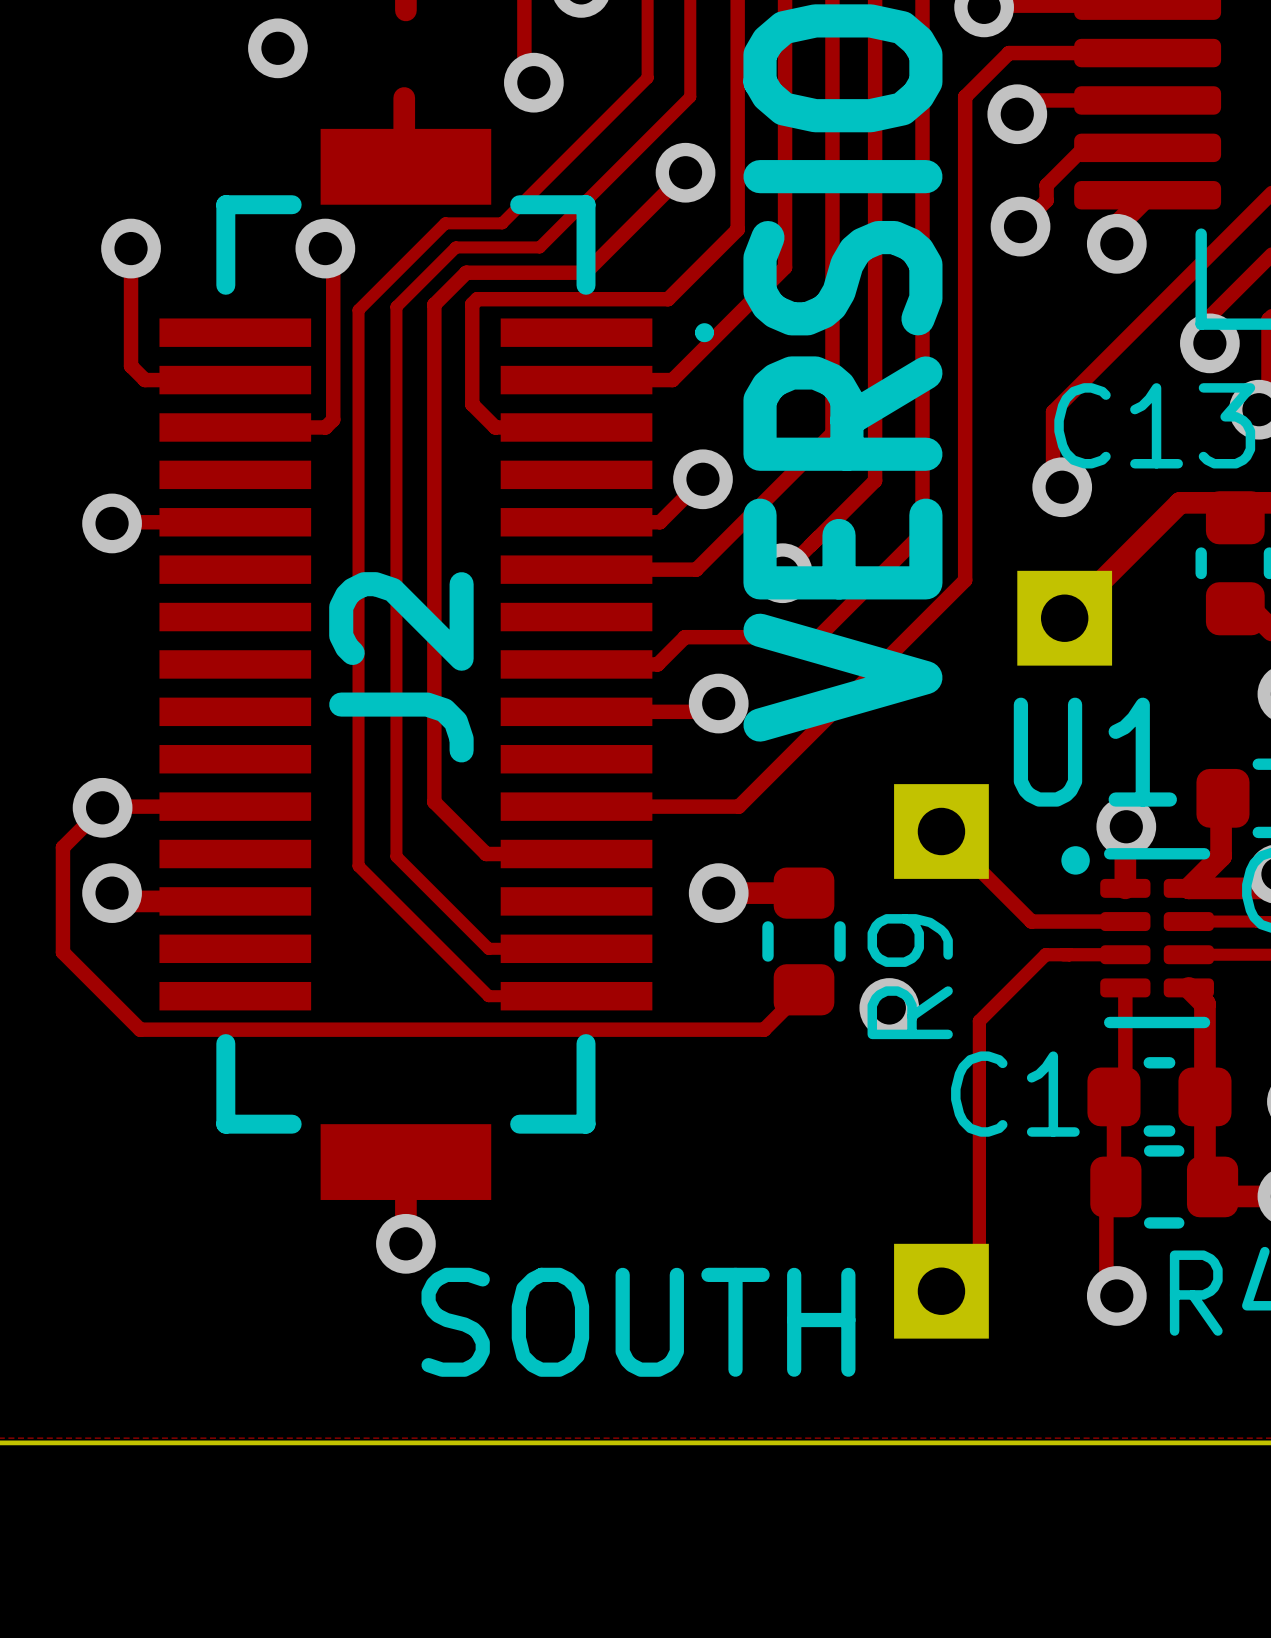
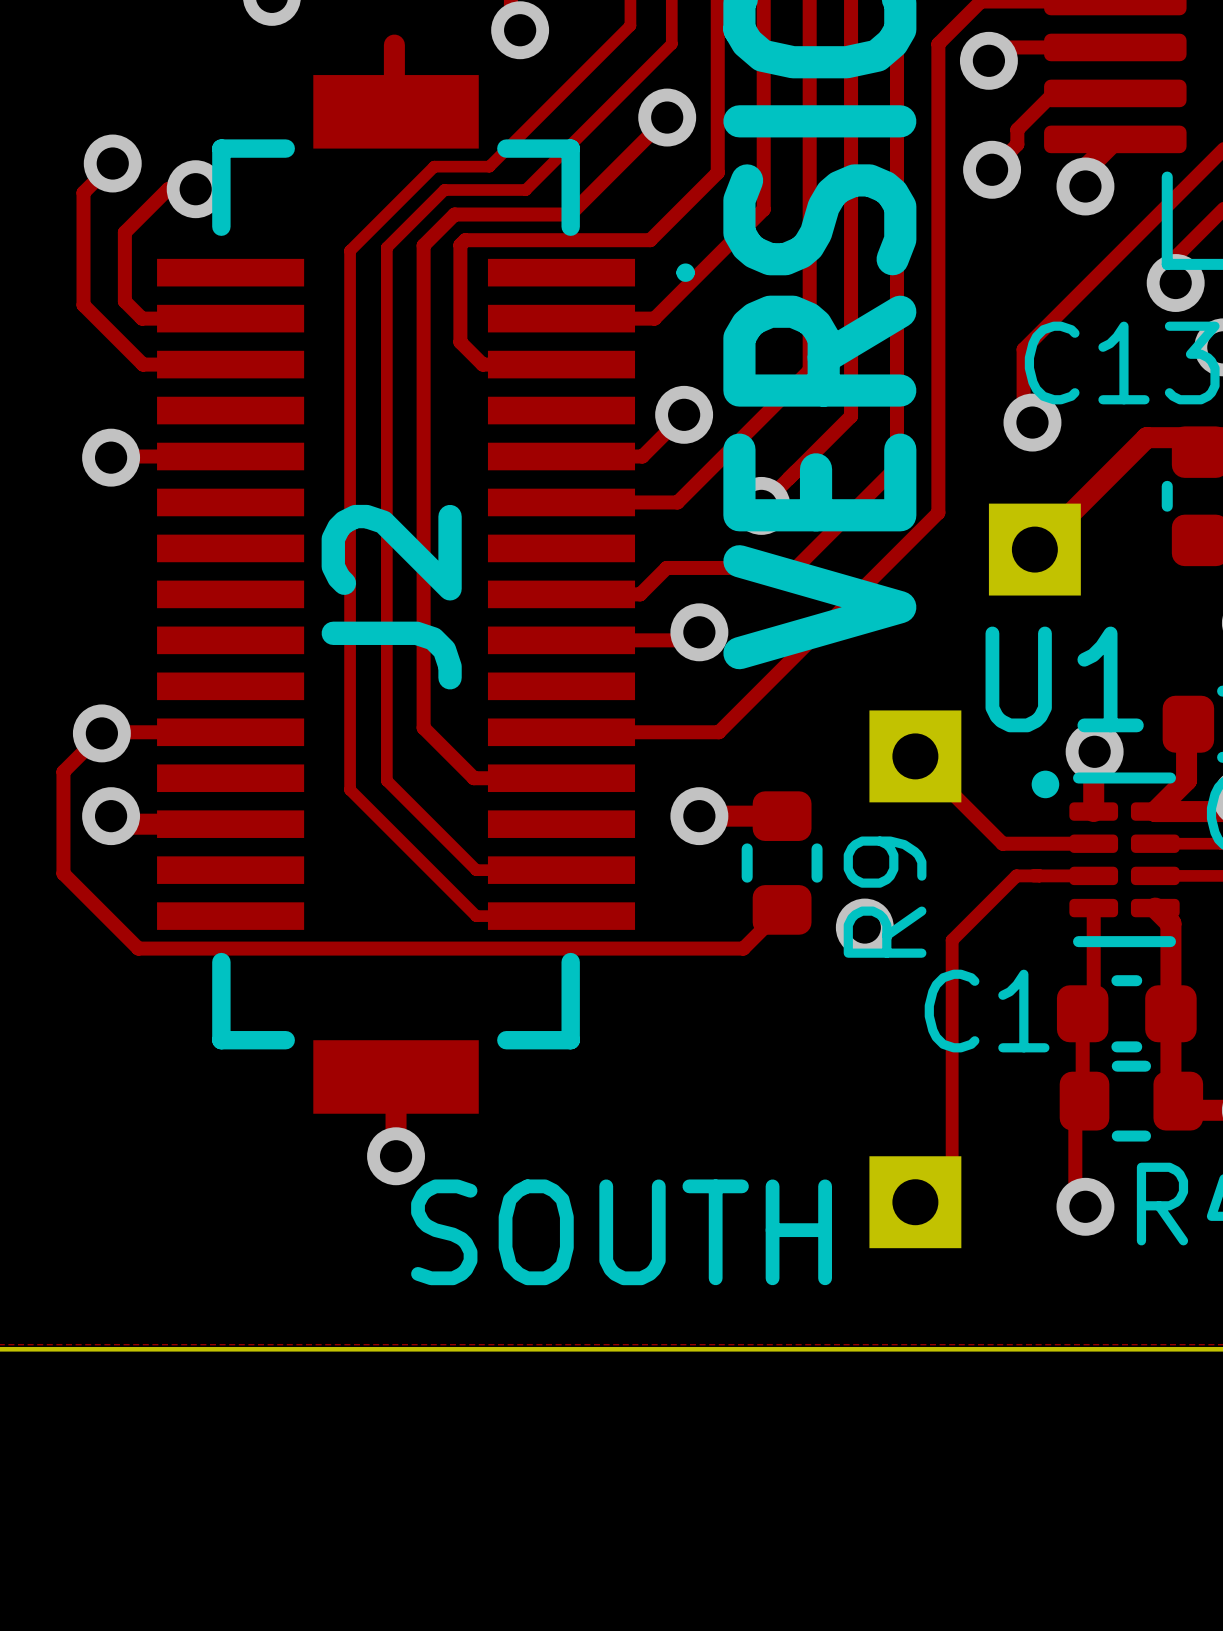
via: none -> (195, 189)
track: (131, 248) (131, 366) (145, 380) -> (195, 189) (168, 189) (124, 232) (124, 301) (142, 318)
via position: (131, 248) -> (112, 163)
track: (325, 248) (333, 256) (333, 419) (325, 427) (235, 427) -> (112, 163) (83, 192) (83, 305) (143, 364) (230, 364)
via: (325, 248) -> none

